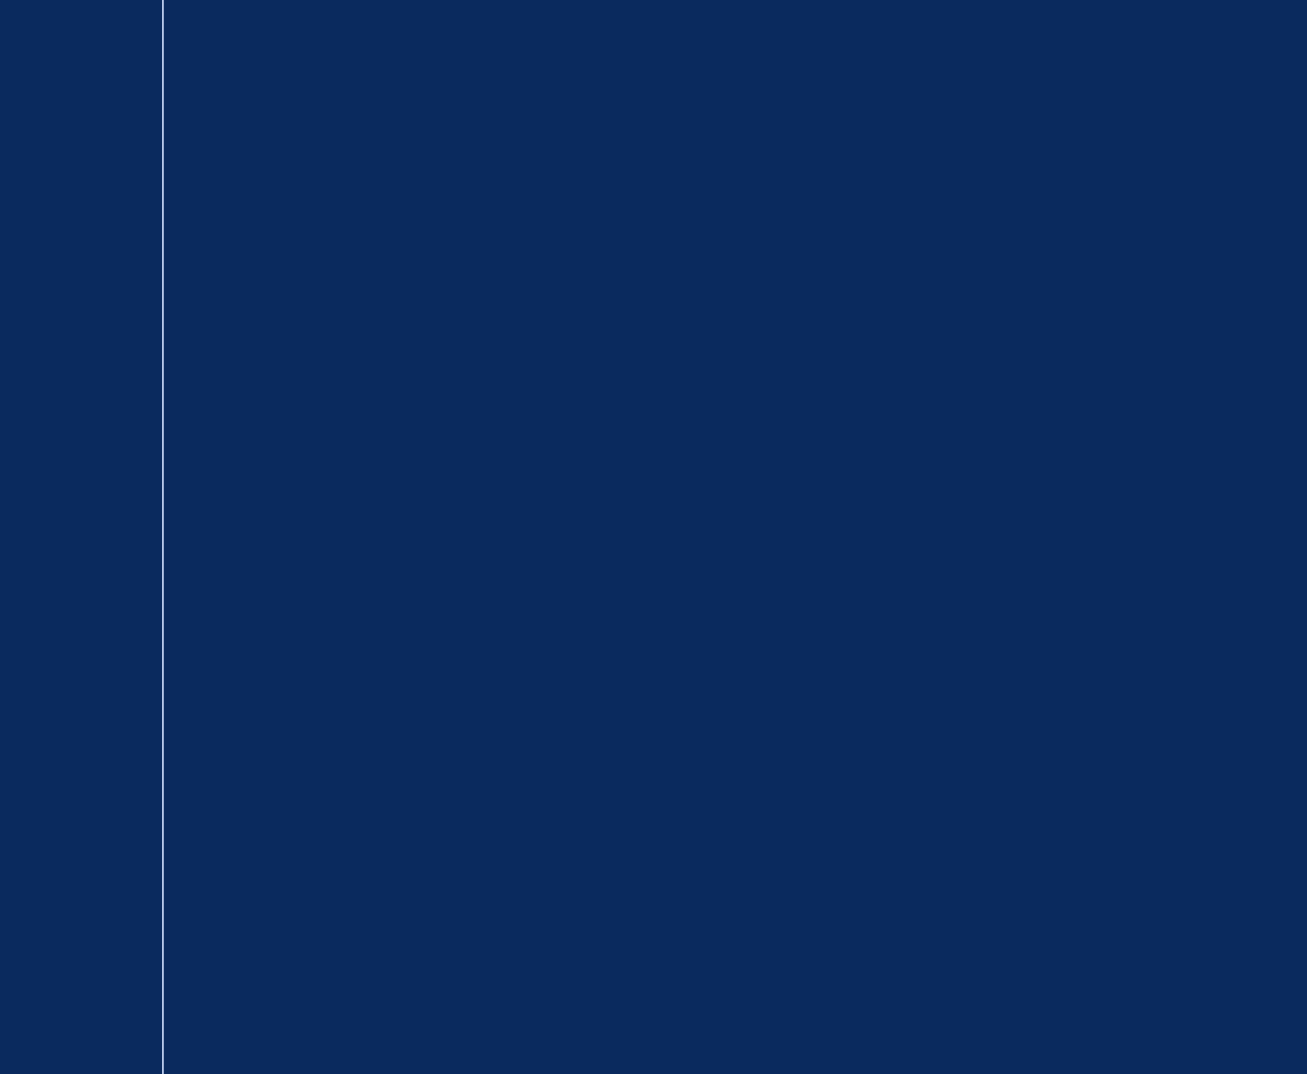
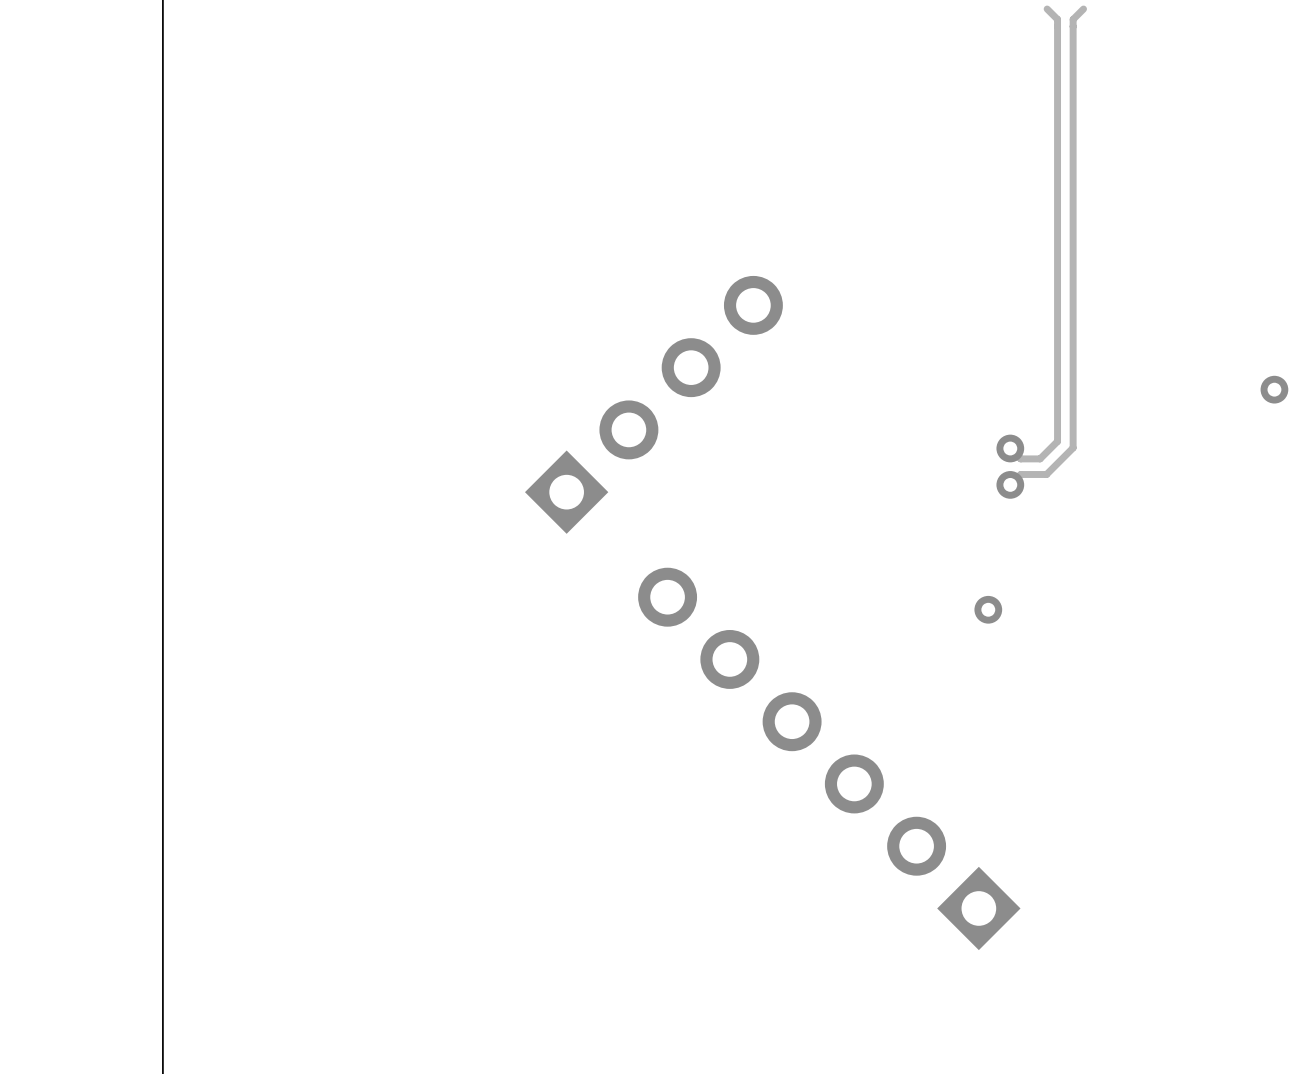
track: none -> (1047, 9) (1057, 19) (1057, 441) (1040, 458) (1020, 458) (1010, 448)
track: none -> (1083, 9) (1073, 19) (1073, 447) (1046, 474) (1020, 474) (1010, 484)
via: none -> (1274, 389)
part: none -> (653, 404)
via: none -> (1010, 448)
via: none -> (1010, 484)
via: none -> (988, 609)
part: none -> (829, 758)

